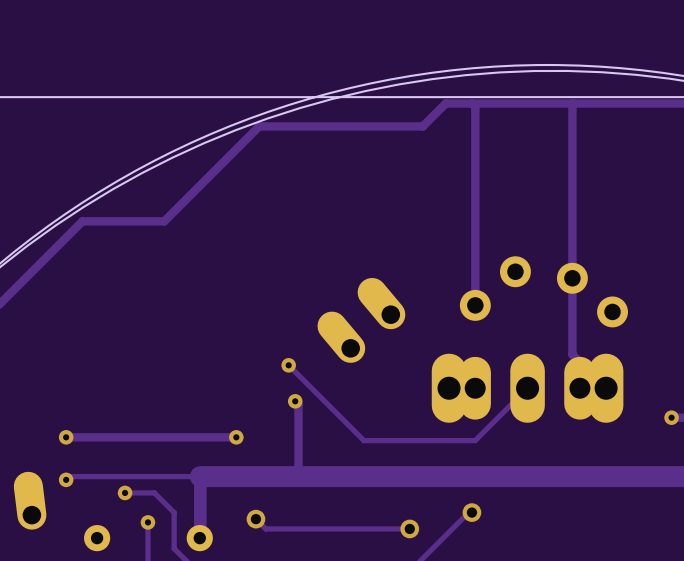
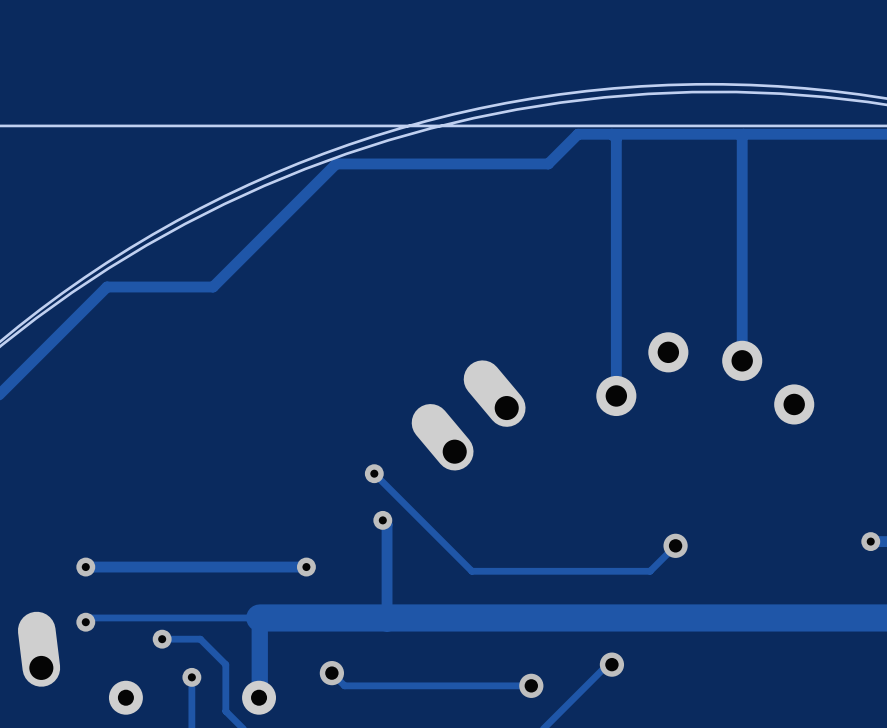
track: (572, 278) (572, 354) (606, 388) -> none
track: (527, 388) (475, 440) -> (675, 545) (650, 571) (616, 571)
part: (527, 388) -> none
part: (527, 388) -> none
via: none -> (675, 545)

